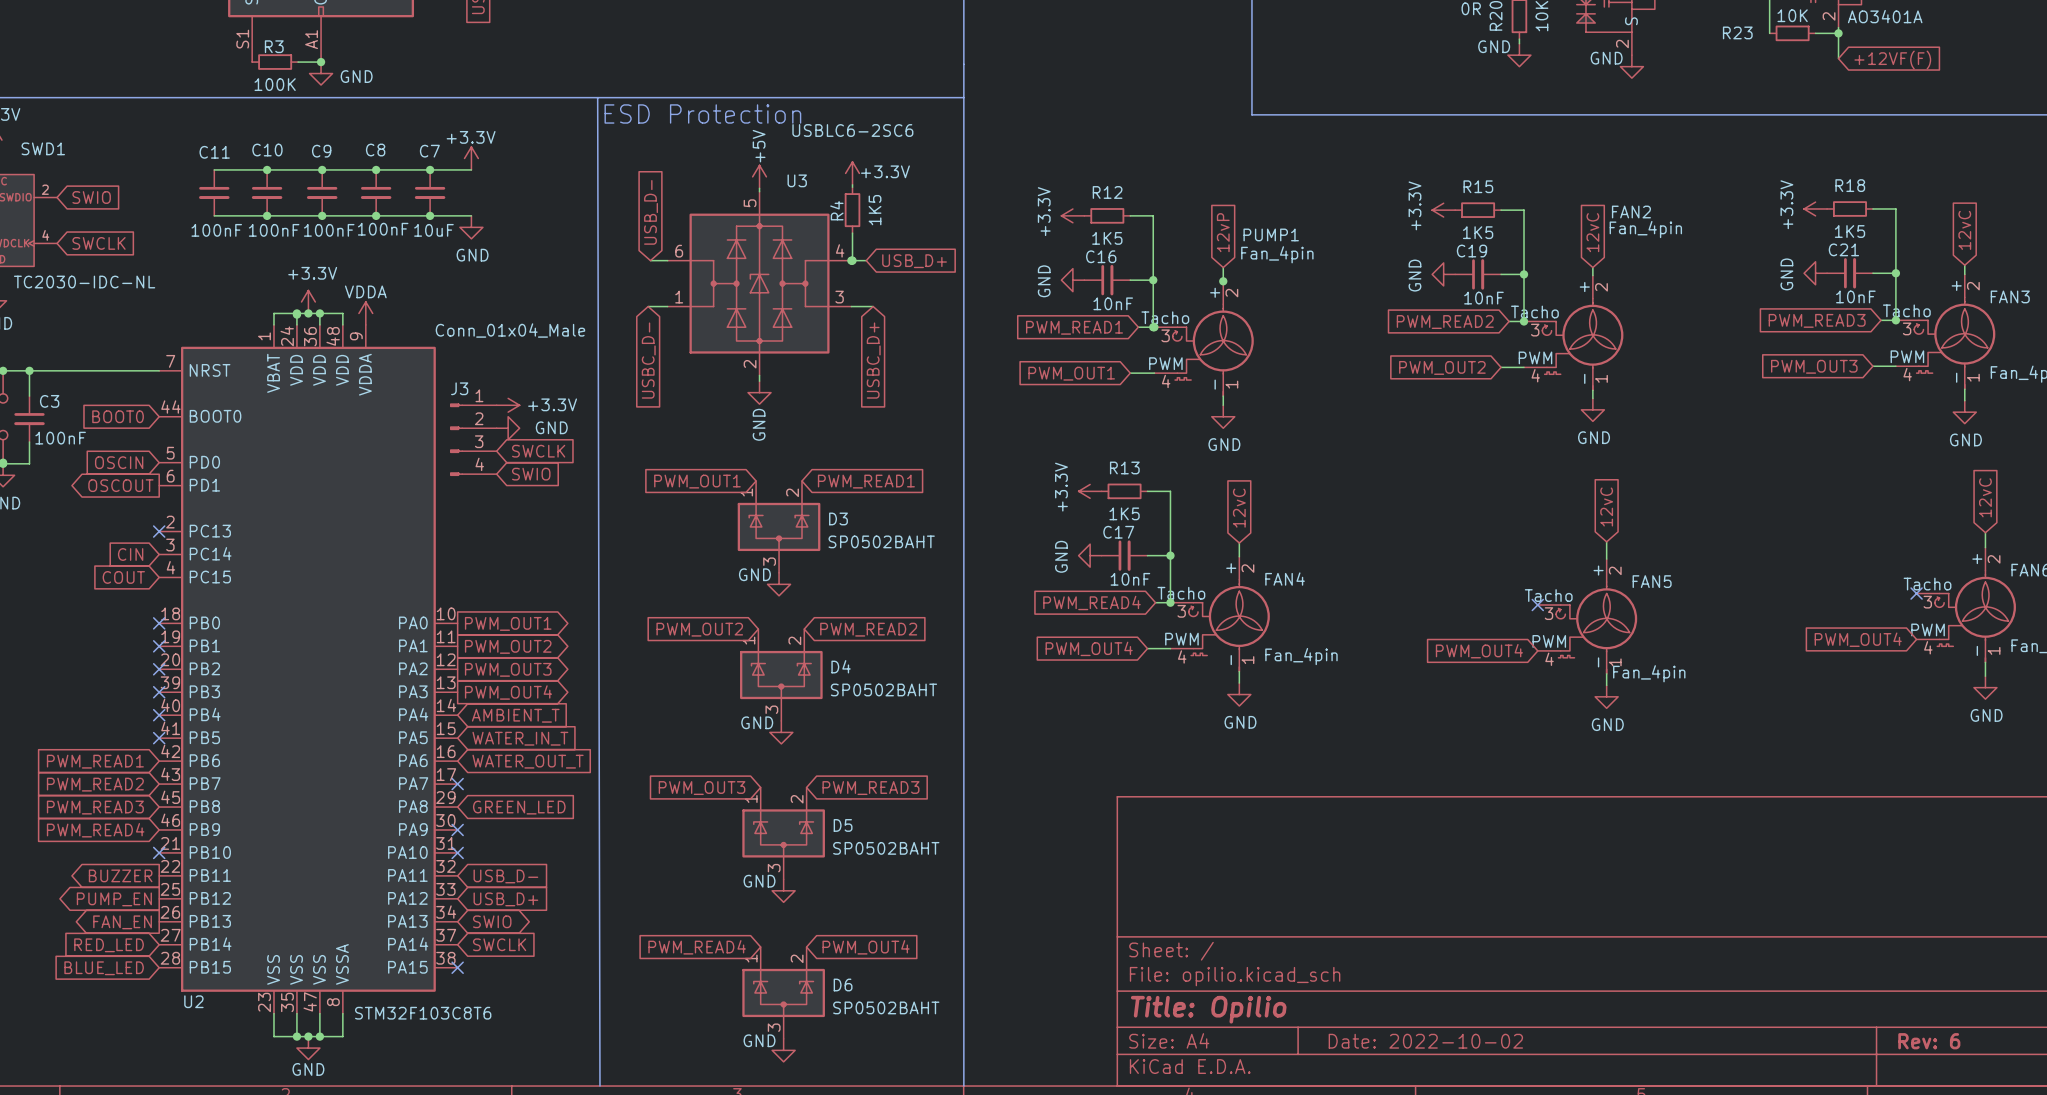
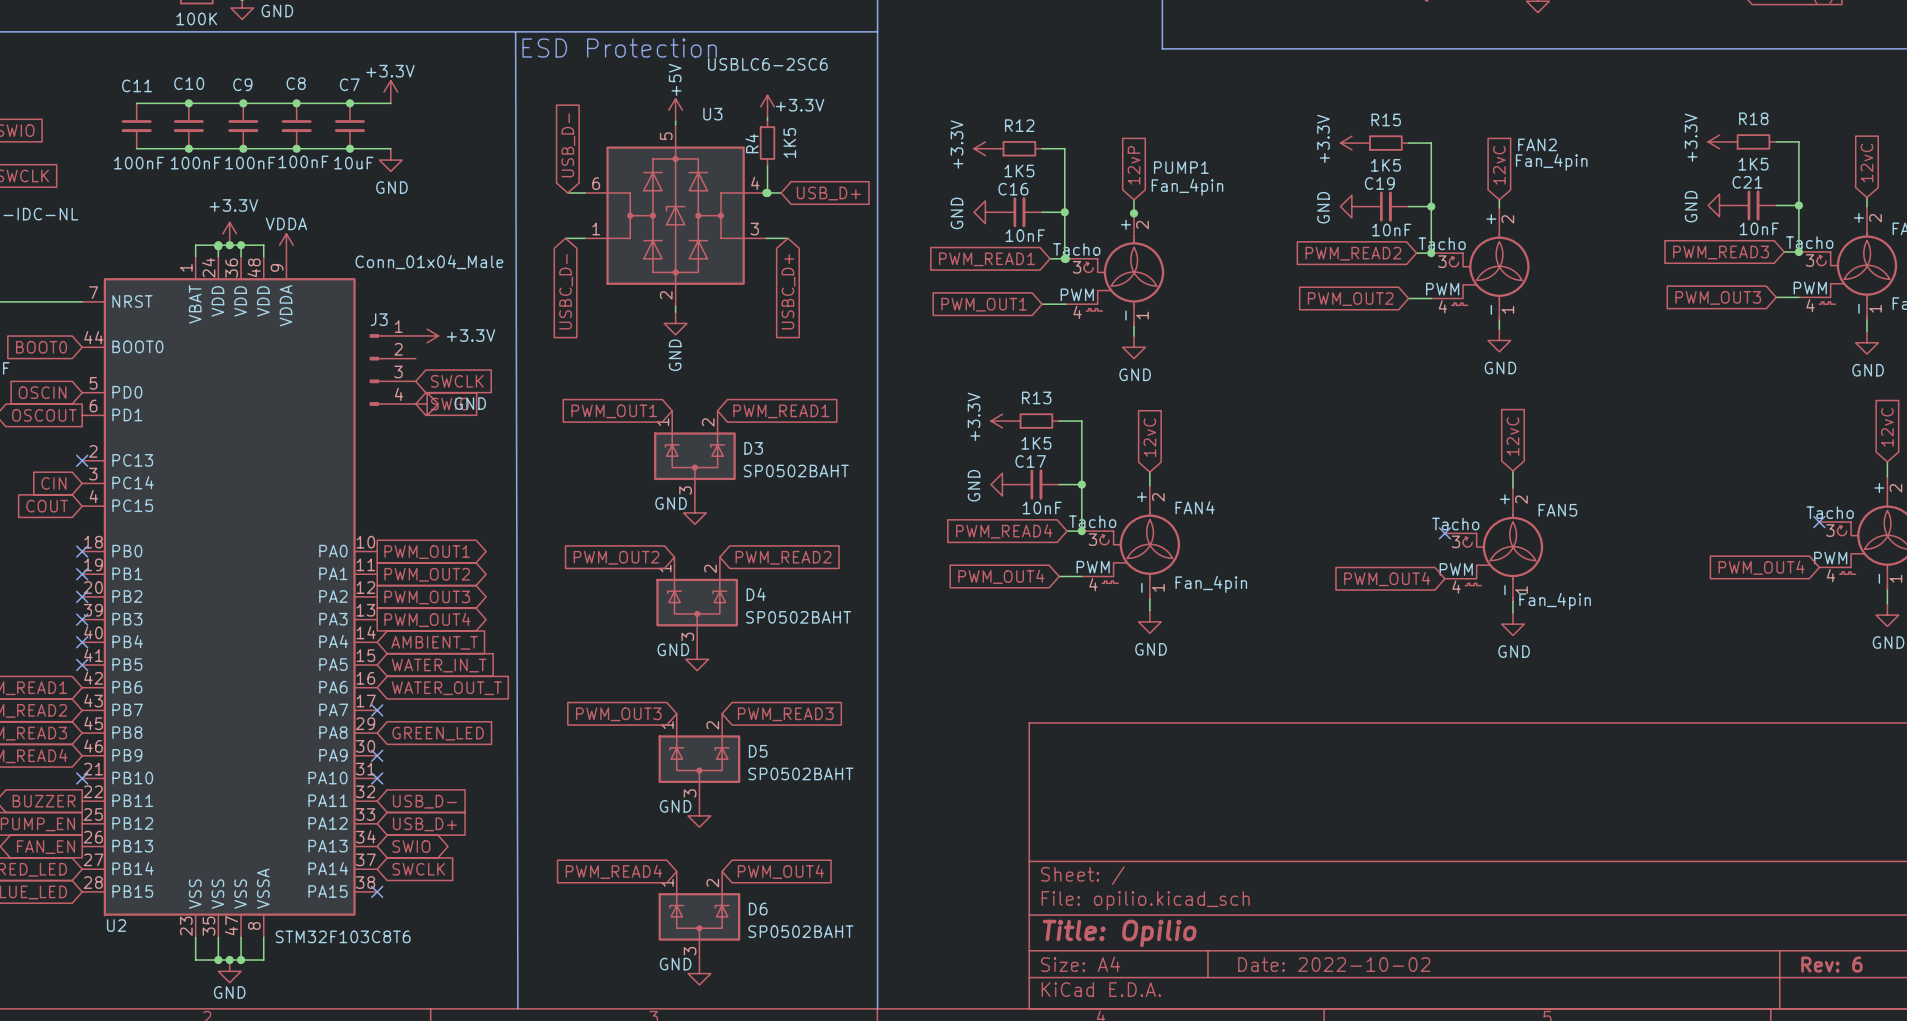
power symbol position: GND (508, 428) -> GND (427, 404)

